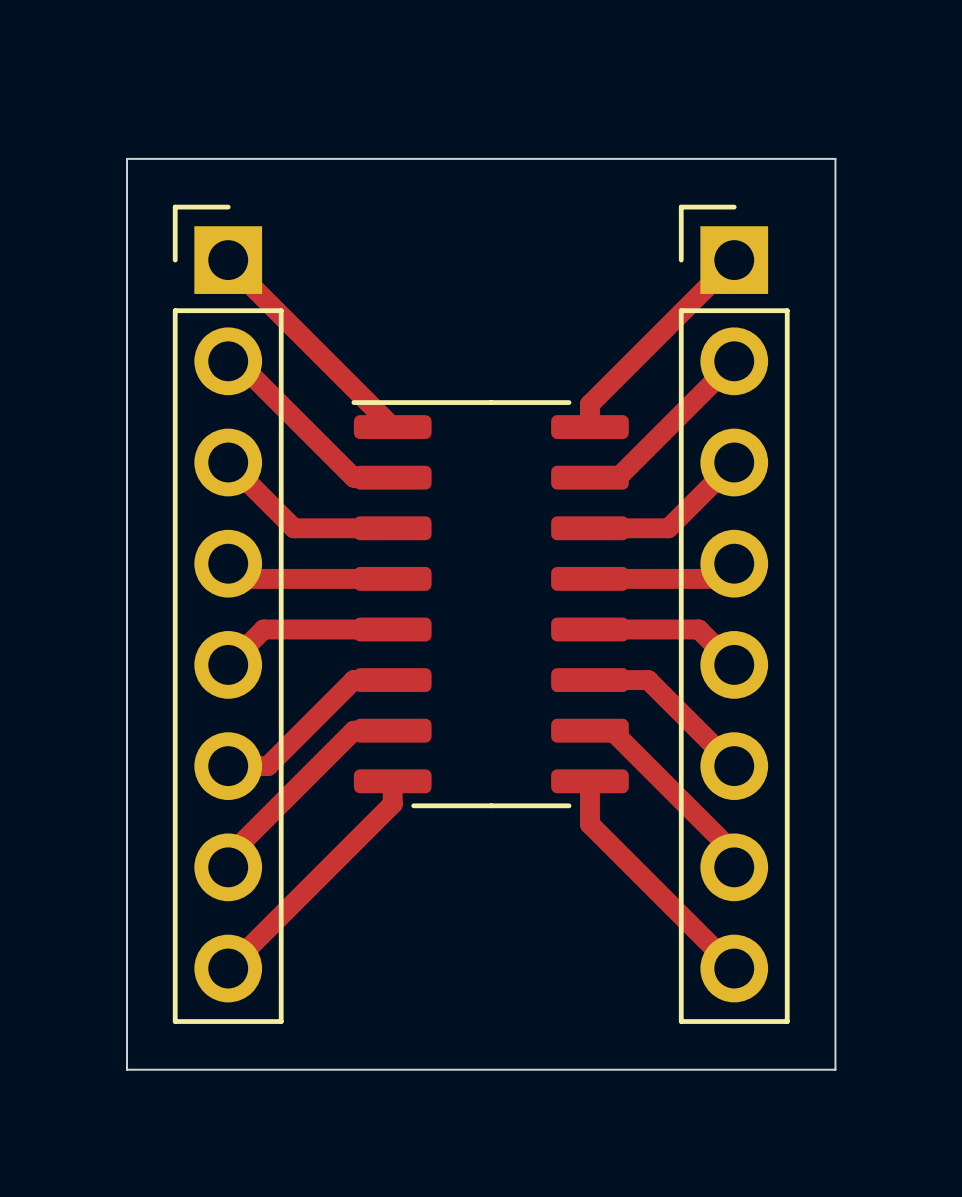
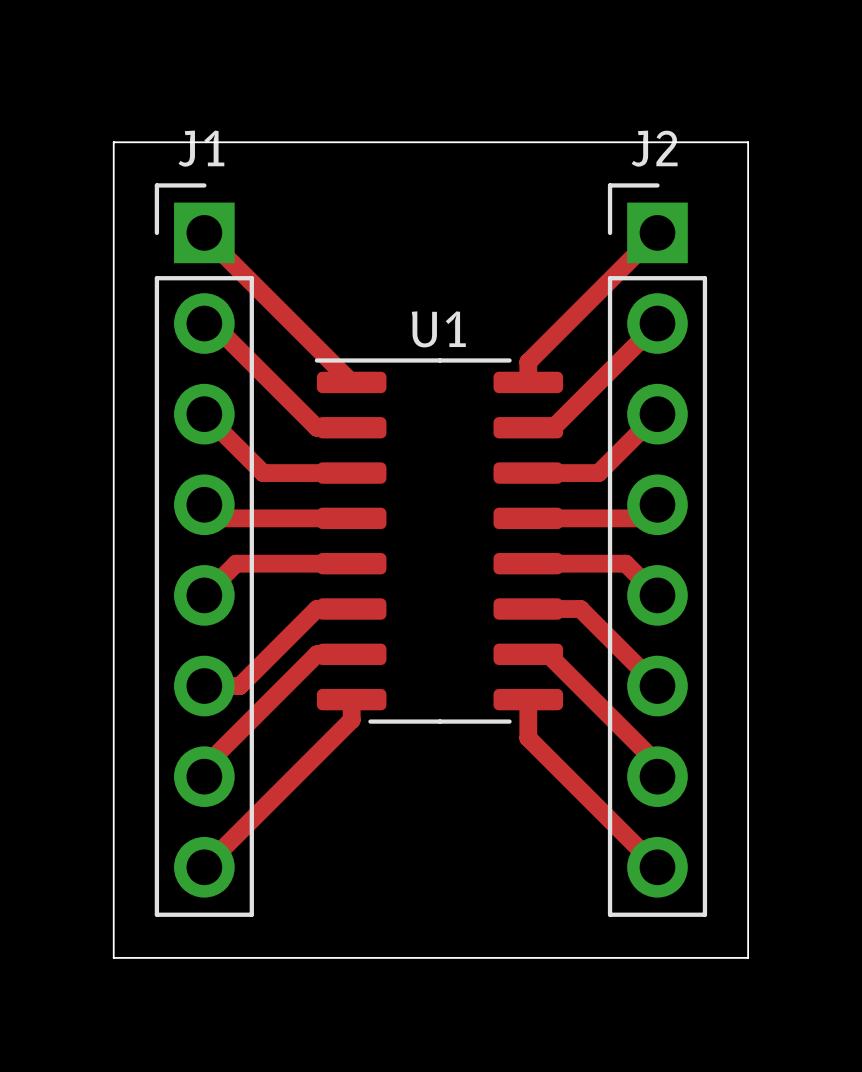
J1 name: none -> J1 (201, 148)
J2 name: none -> J2 (654, 148)
U1 name: none -> U1 (438, 329)

